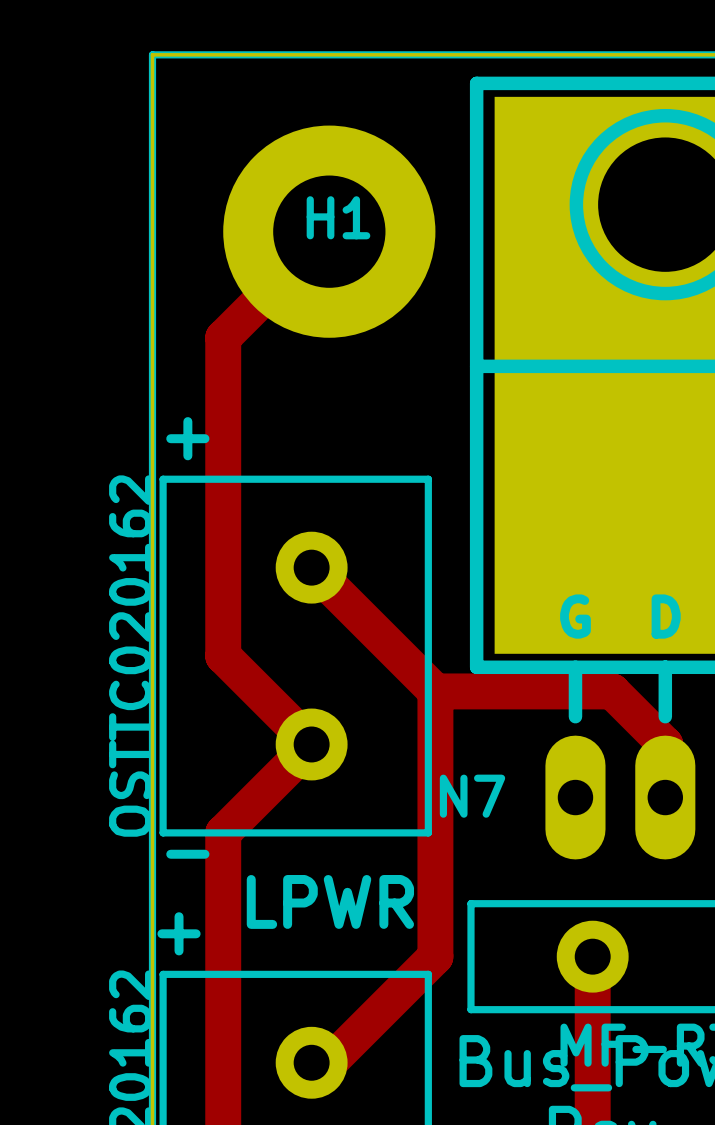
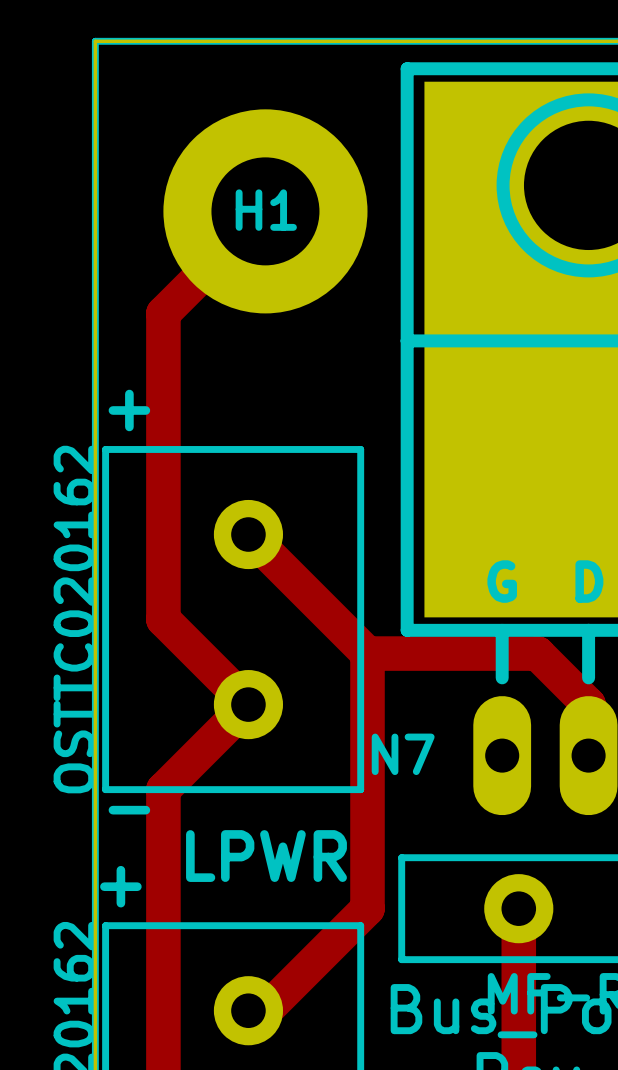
H1 name position: H1 (338, 217) -> H1 (266, 210)

